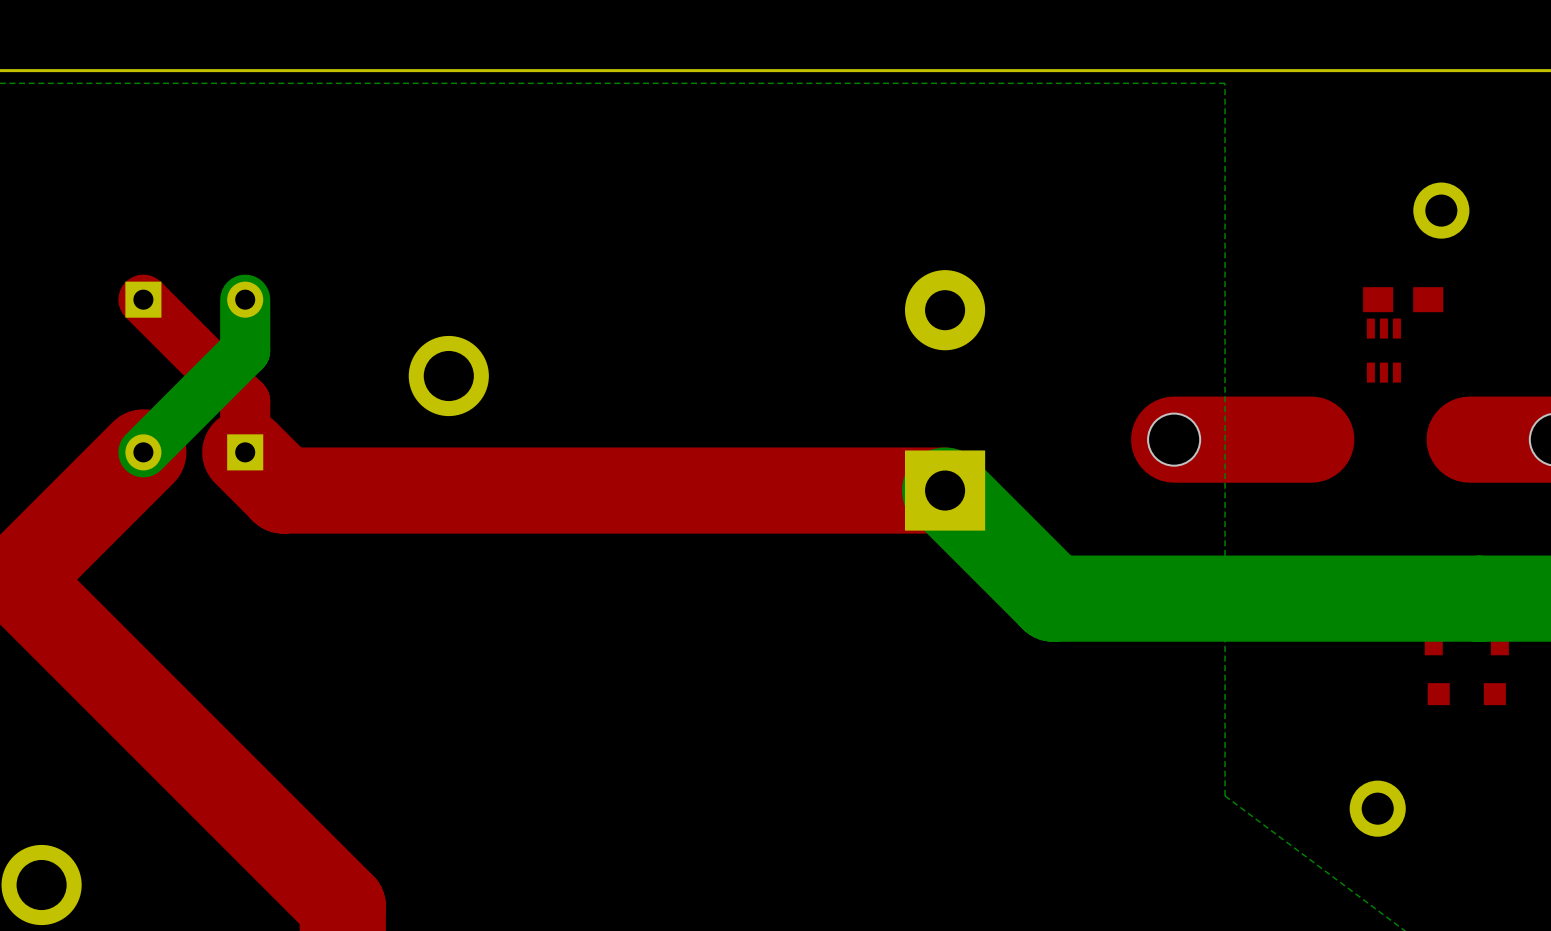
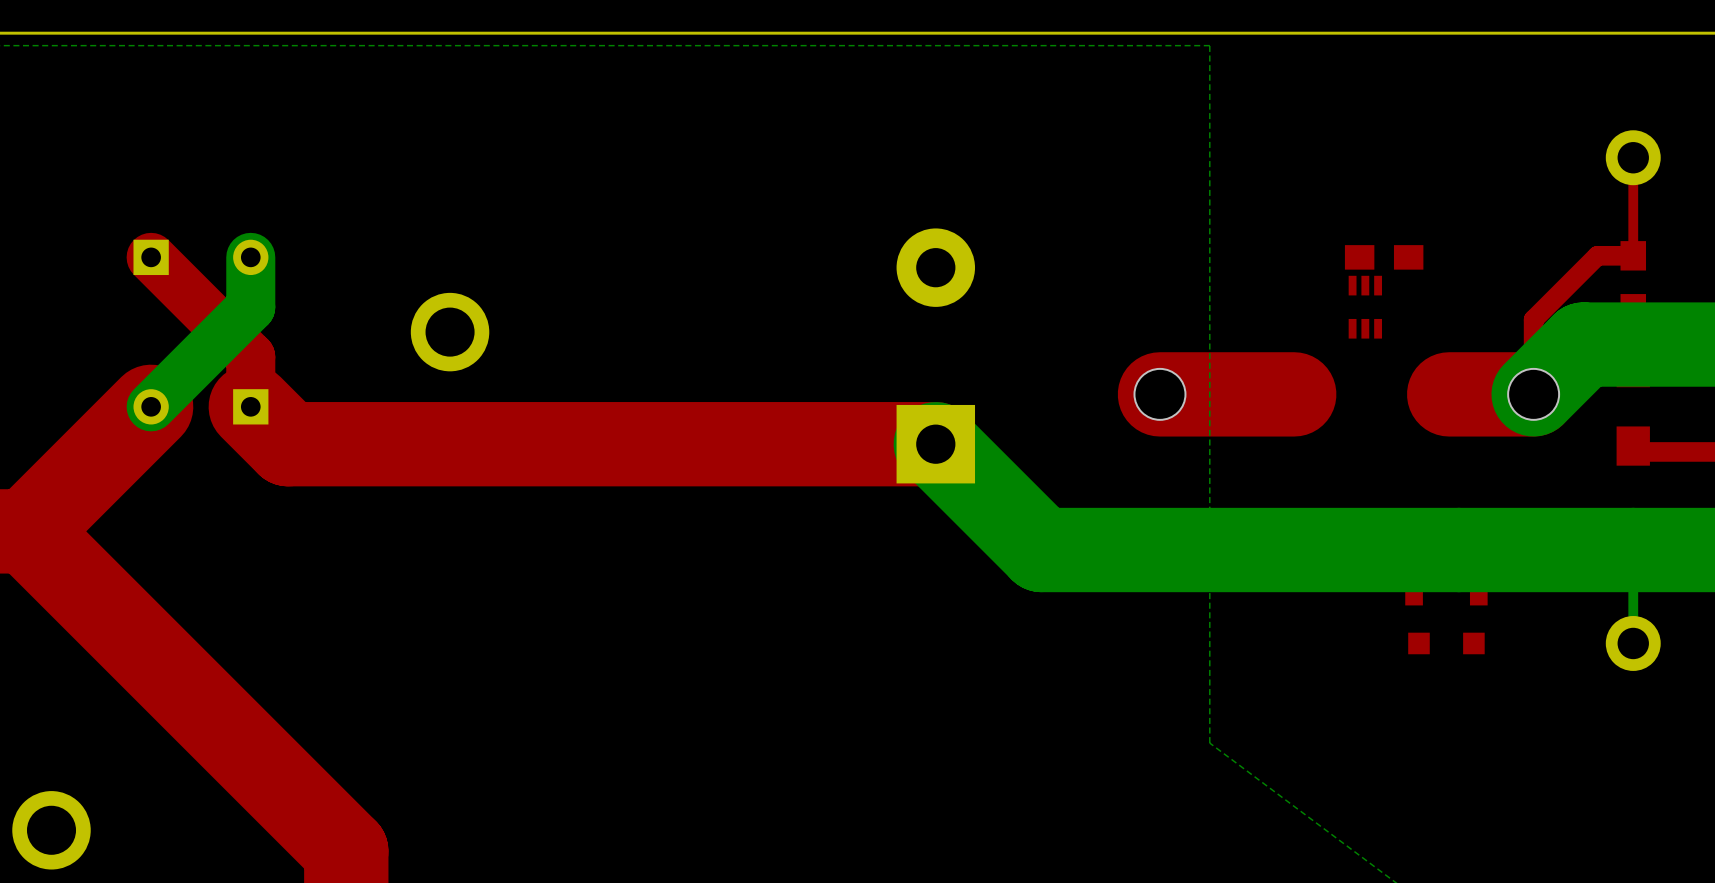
part: (1441, 210) -> none
part: (1377, 808) -> none

